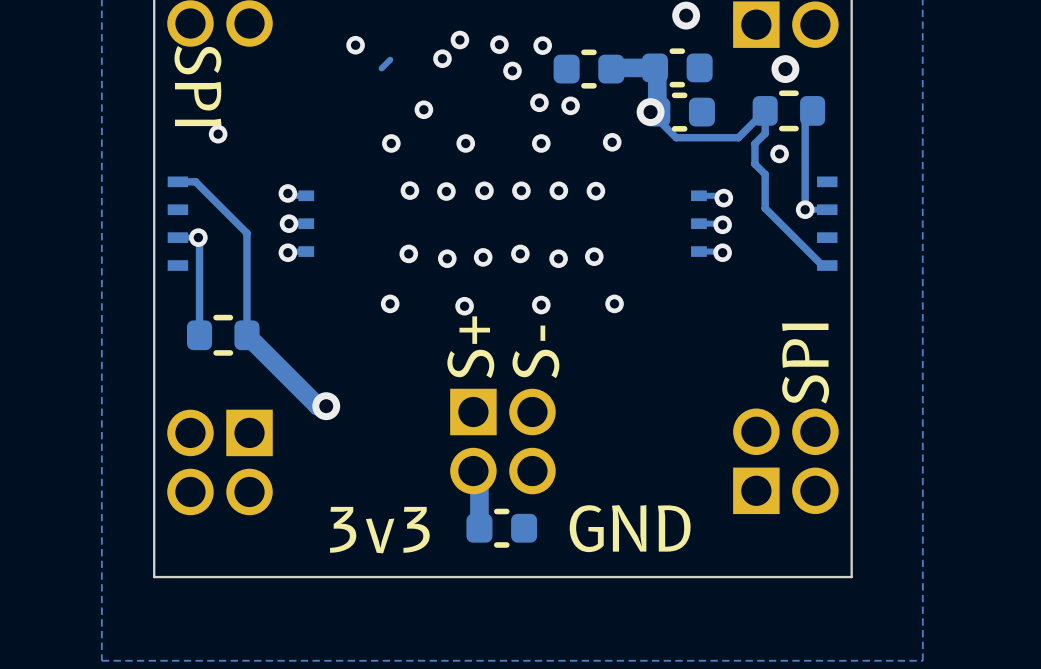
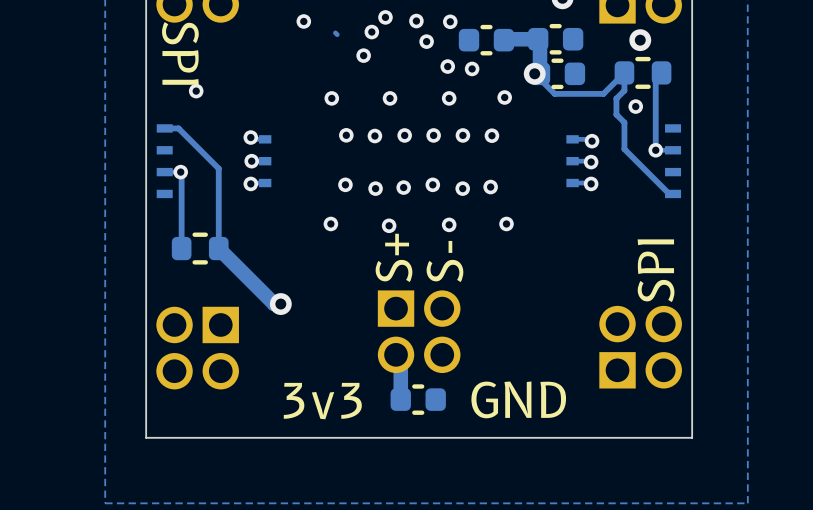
track: (390, 59) (381, 68) -> none
track: none -> (335, 32) (337, 34)
via position: (423, 109) -> (363, 55)

